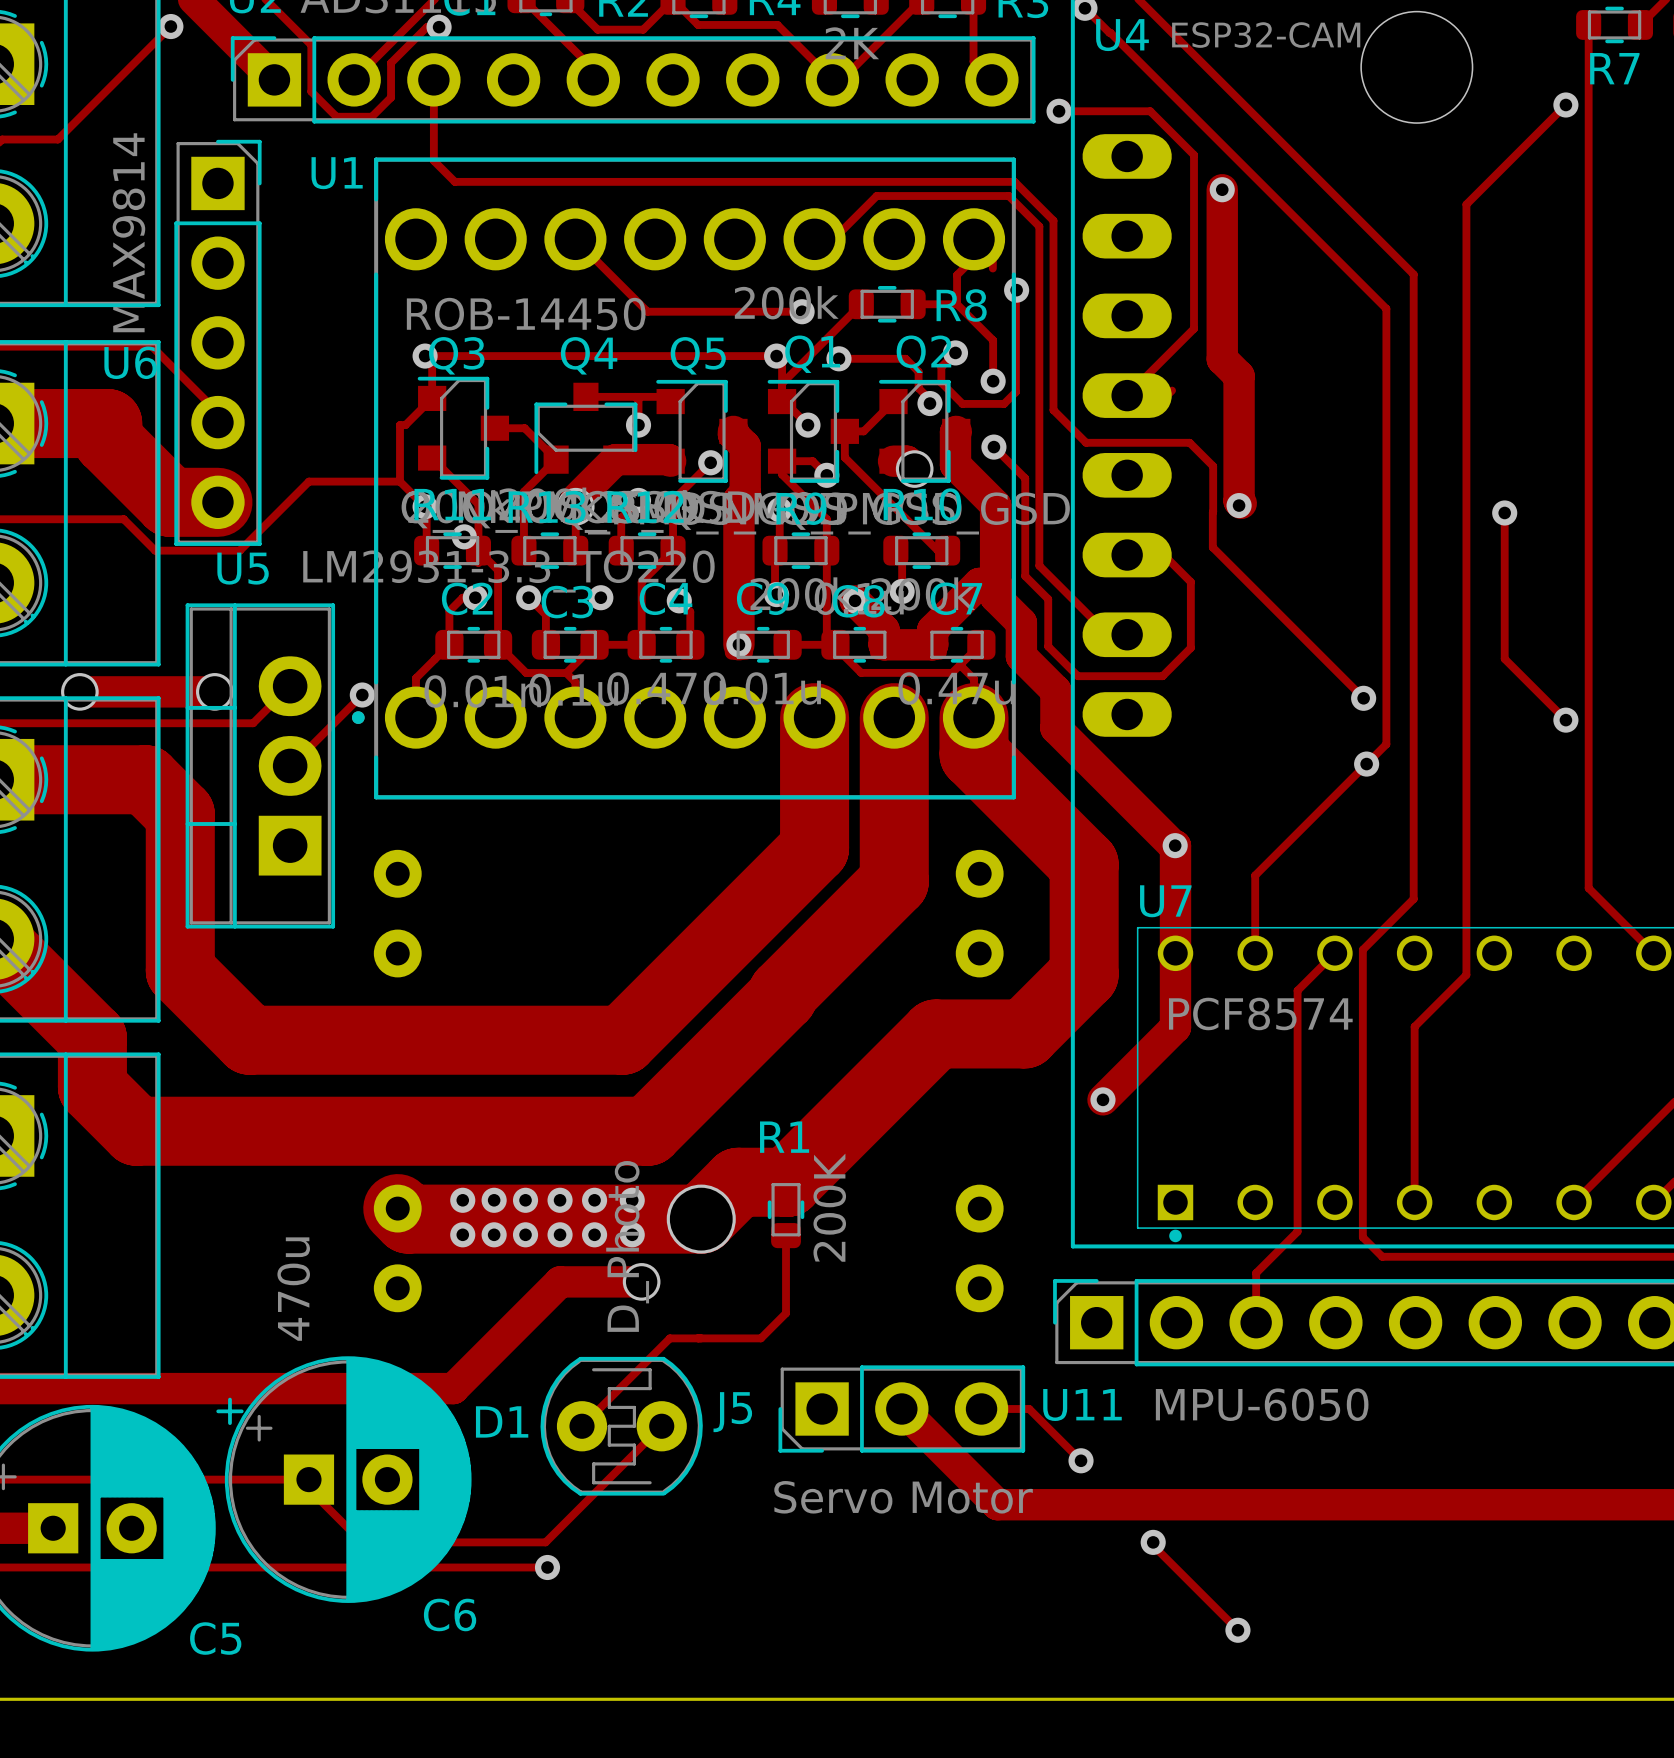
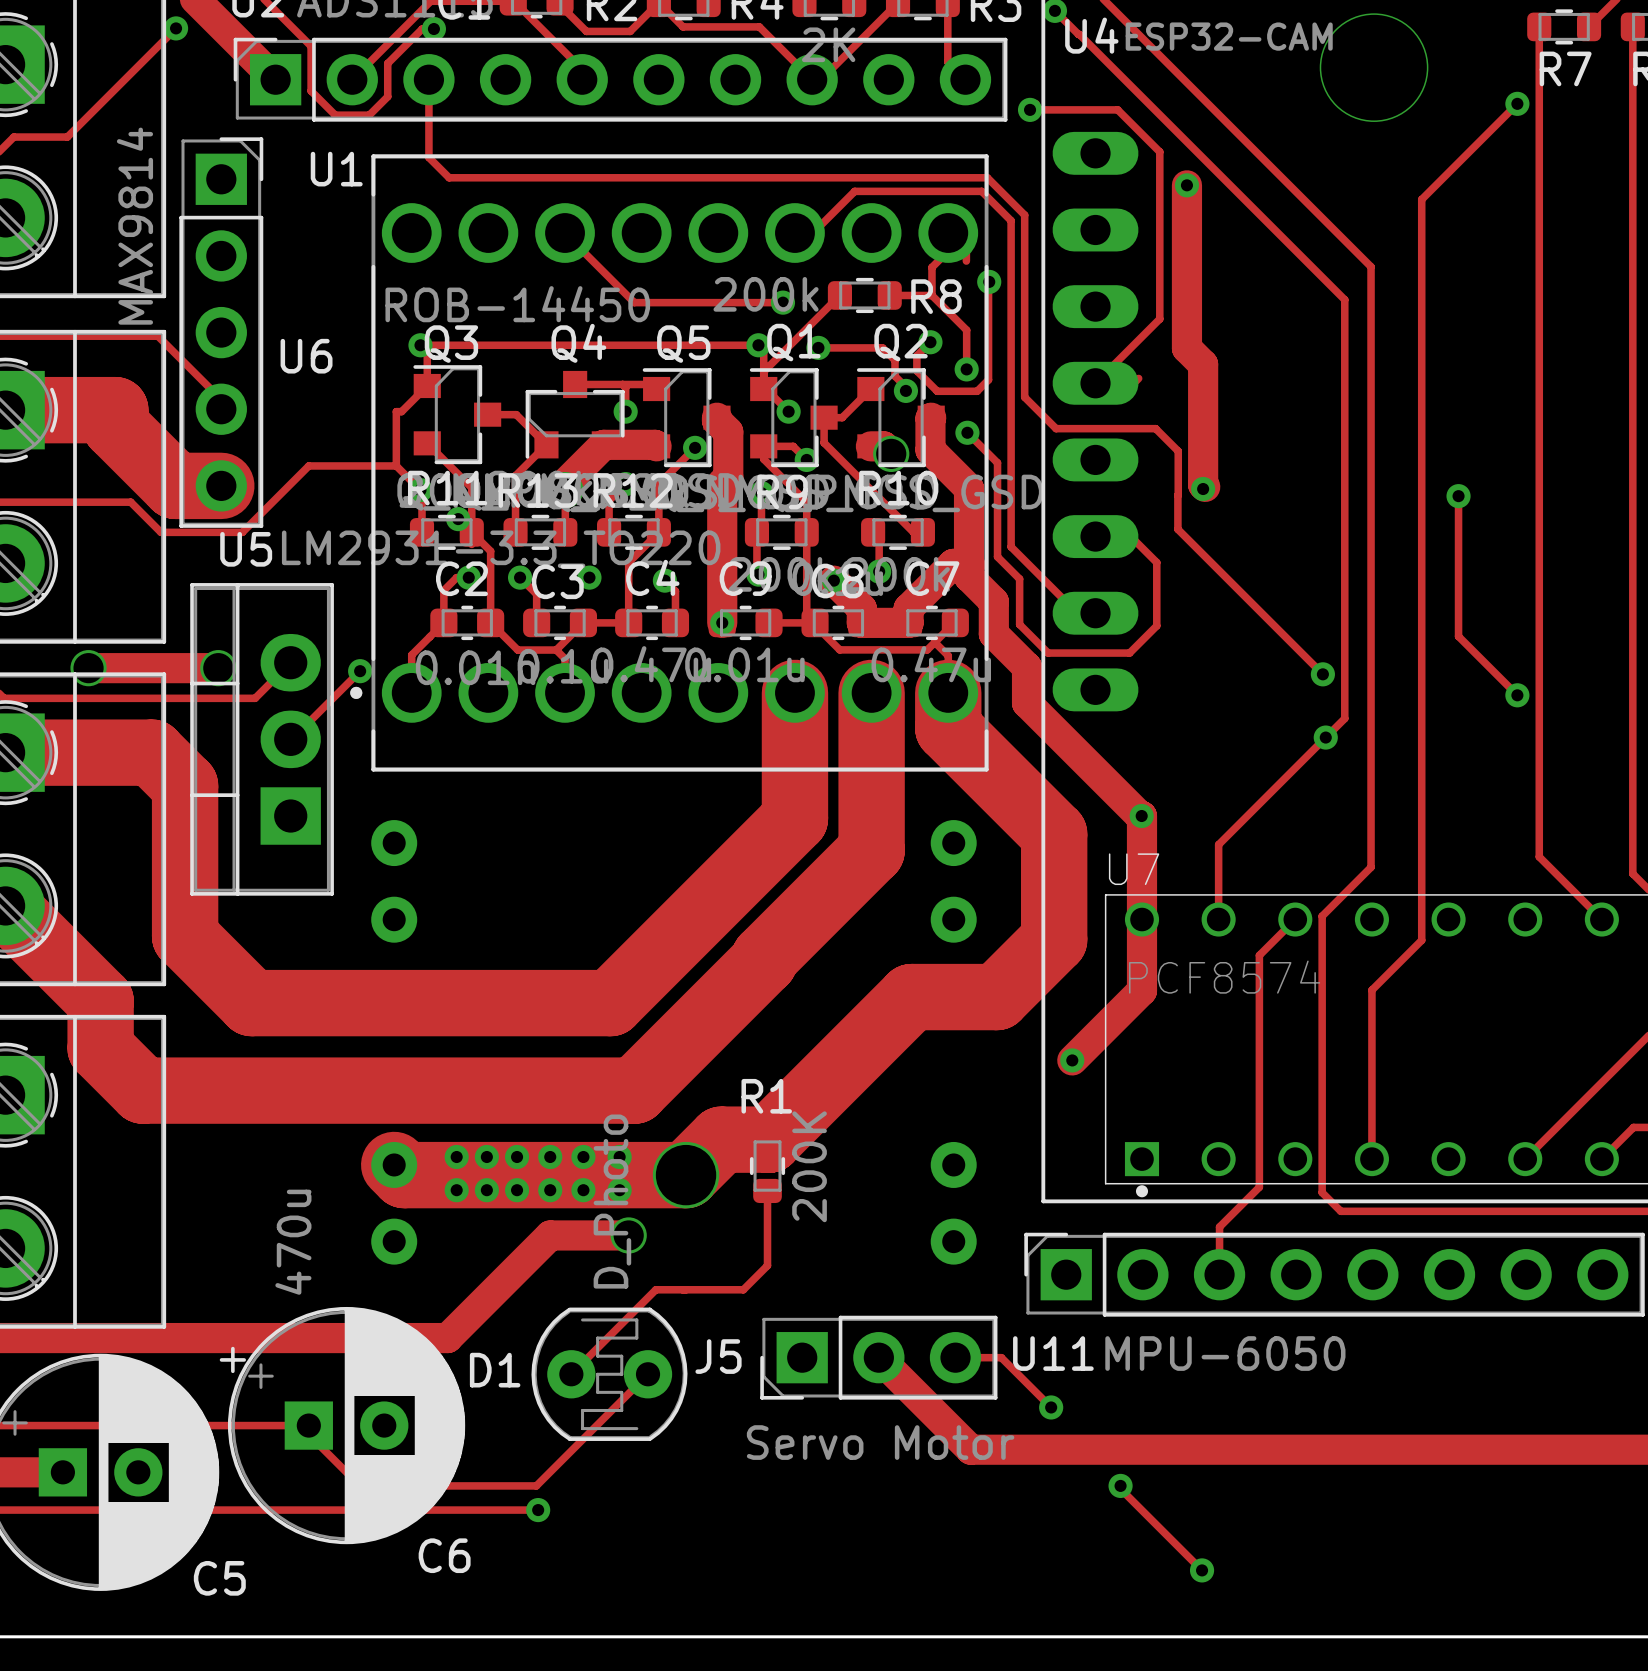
U6 name position: U6 (130, 362) -> U6 (306, 356)

